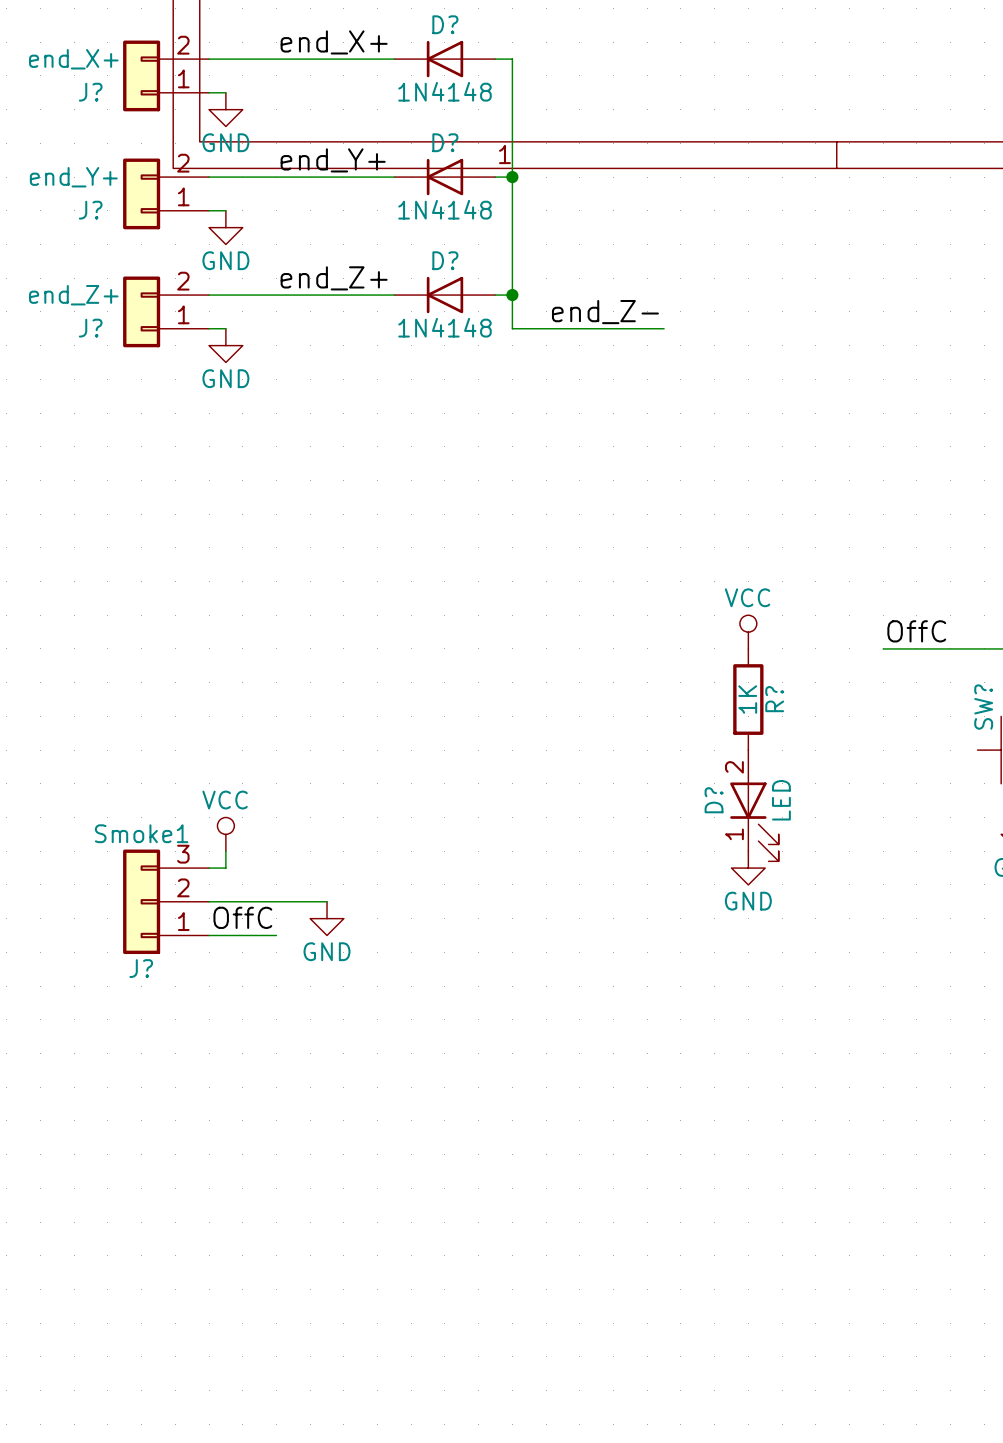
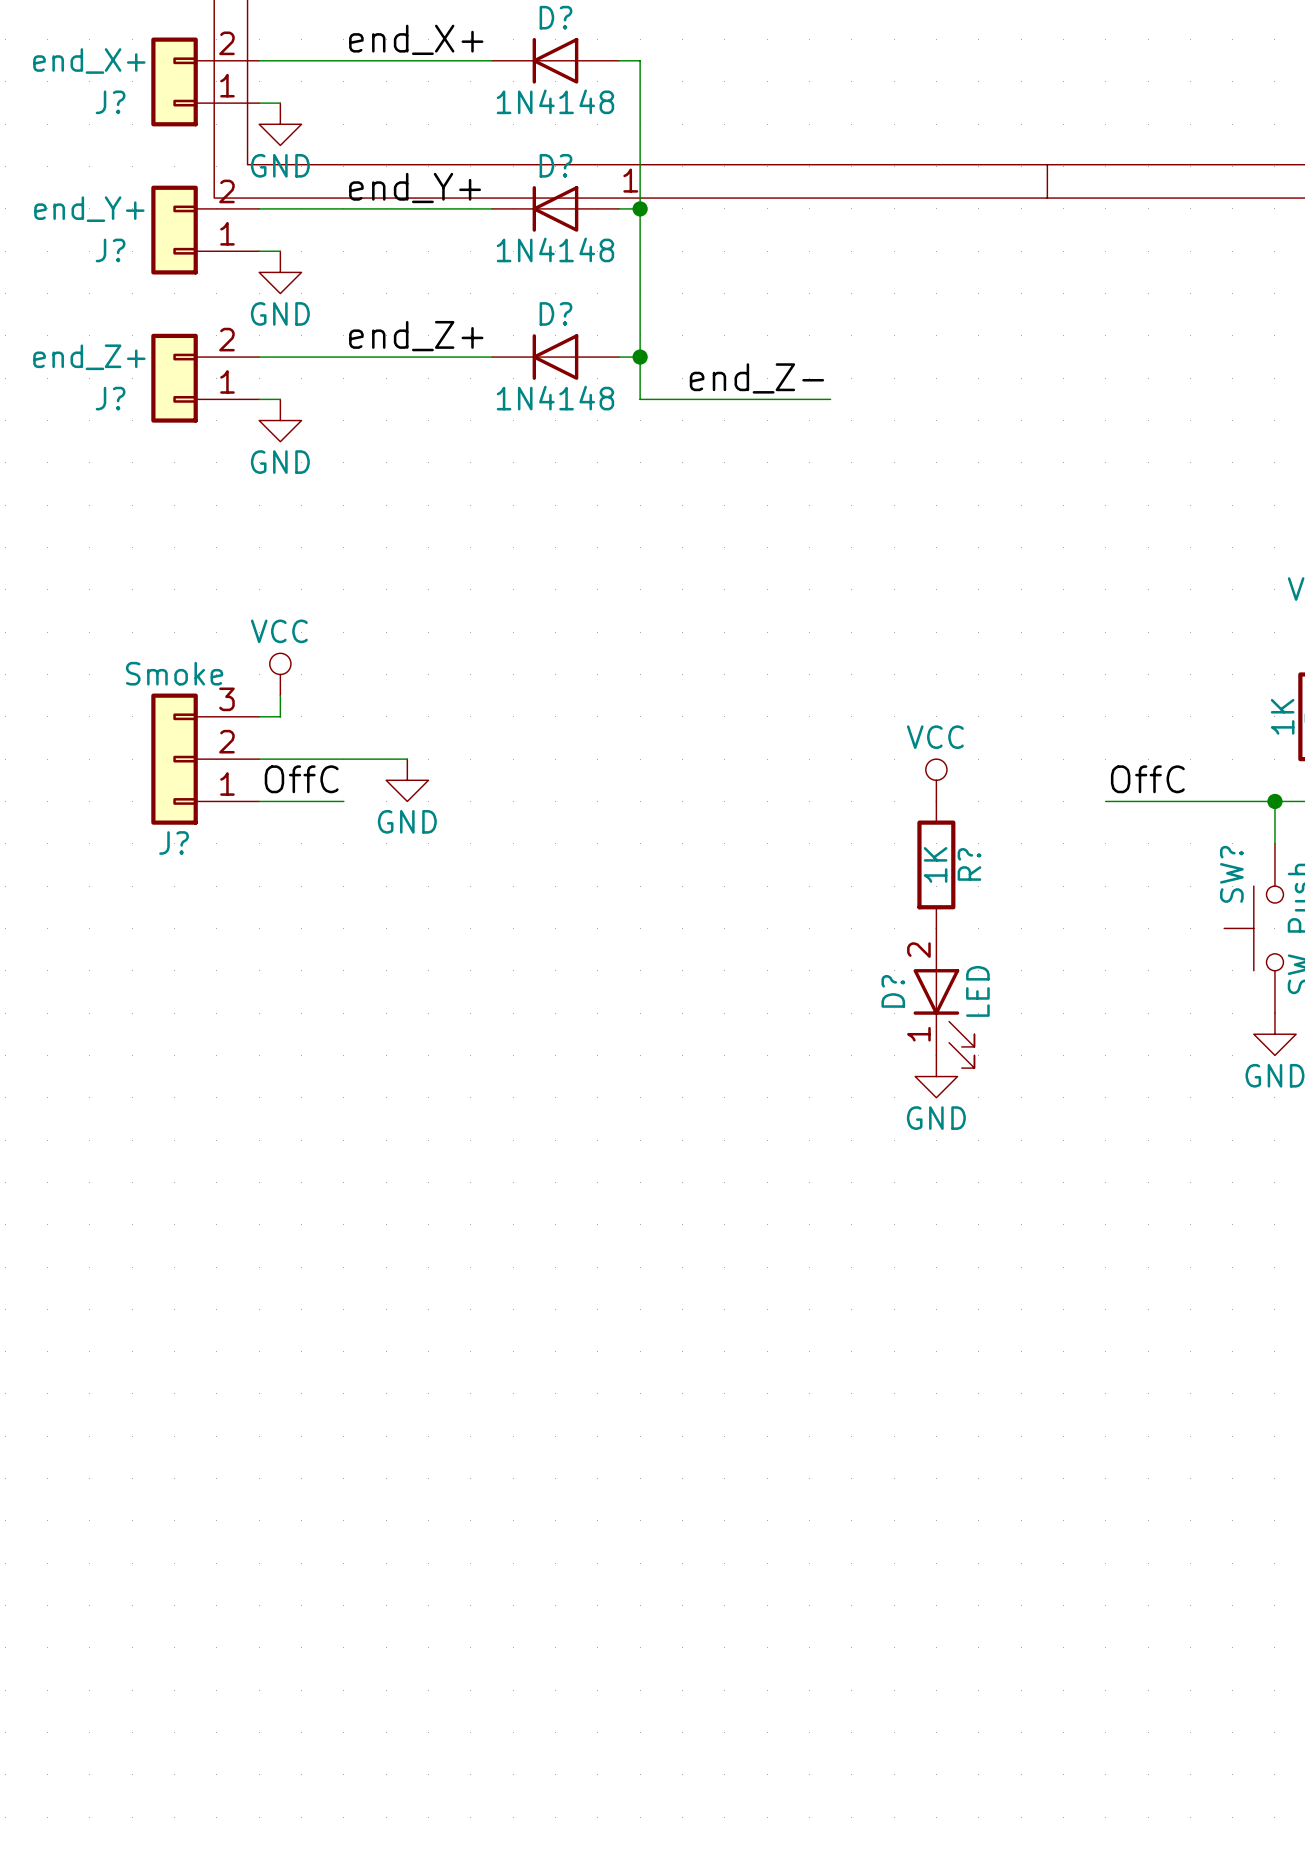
J?: none -> Smoke (205, 759)
power symbol position: VCC (225, 834) -> VCC (280, 674)
wire: (225, 851) (225, 868) (209, 868) -> (280, 695) (280, 716) (259, 716)
J?: Smoke1 (166, 901) -> none
wire: (209, 901) (327, 901) -> (259, 759) (407, 759)
label position: OffC (242, 917) -> OffC (301, 779)
power symbol position: GND (327, 918) -> GND (407, 780)
wire: (209, 935) (276, 935) -> (259, 801) (343, 801)

